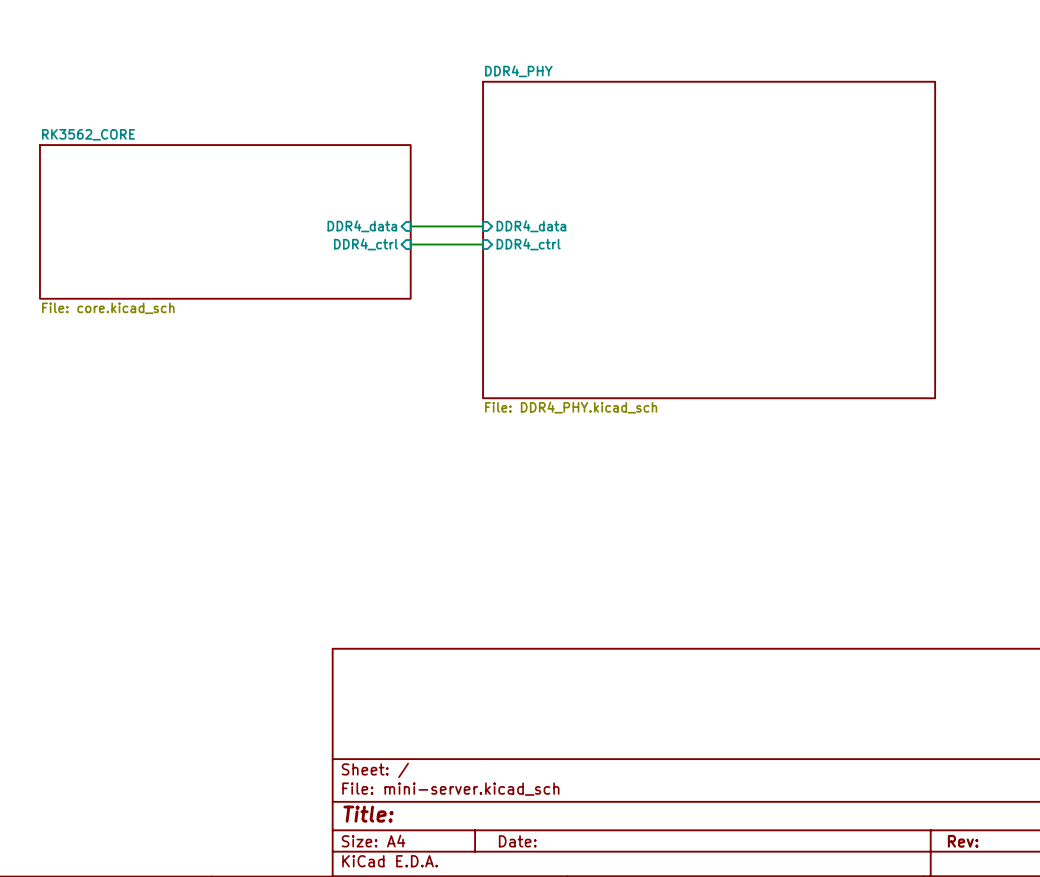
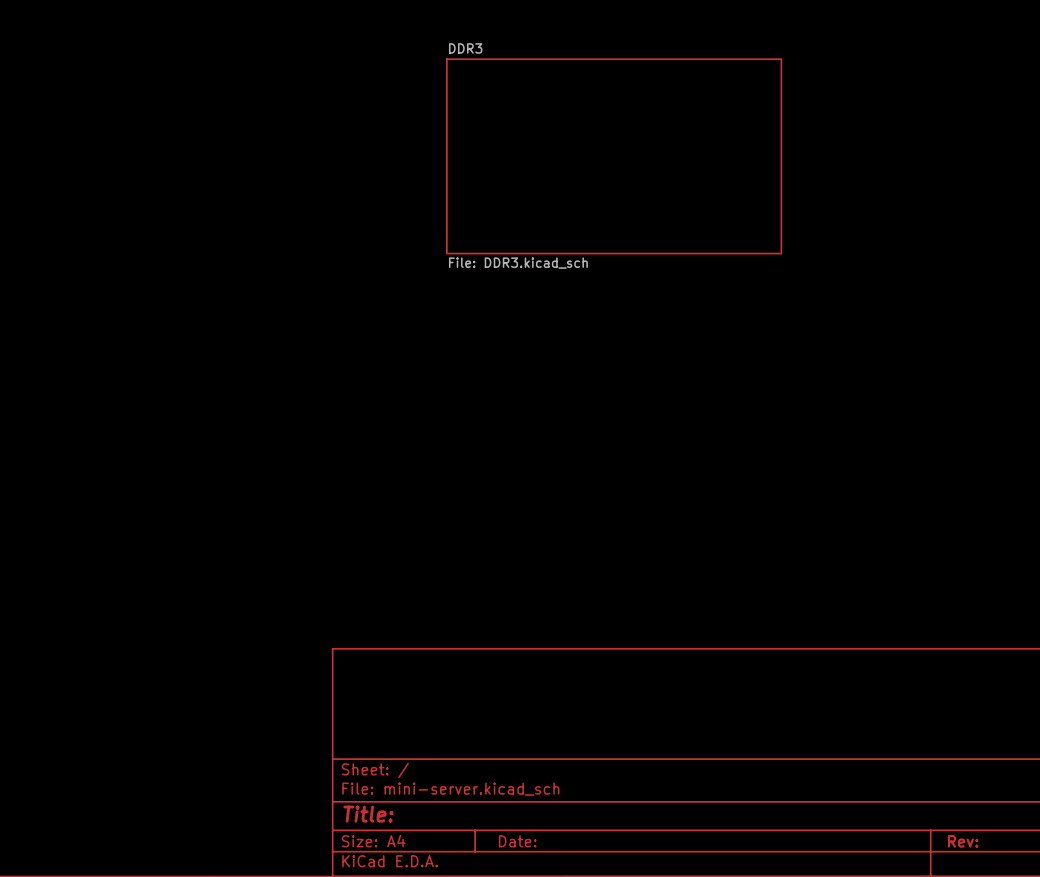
sheet DDR3: none -> File: DDR3.kicad_sch (614, 156)
sheet RK3562_CORE: File: core.kicad_sch (225, 221) -> none
sheet pin: DDR4_data (362, 226) -> none
wire: (410, 226) (483, 226) -> none
sheet pin: DDR4_data (531, 226) -> none
sheet DDR4_PHY: File: DDR4_PHY.kicad_sch (709, 239) -> none
sheet pin: DDR4_ctrl (365, 244) -> none
wire: (410, 244) (483, 244) -> none
sheet pin: DDR4_ctrl (528, 244) -> none

